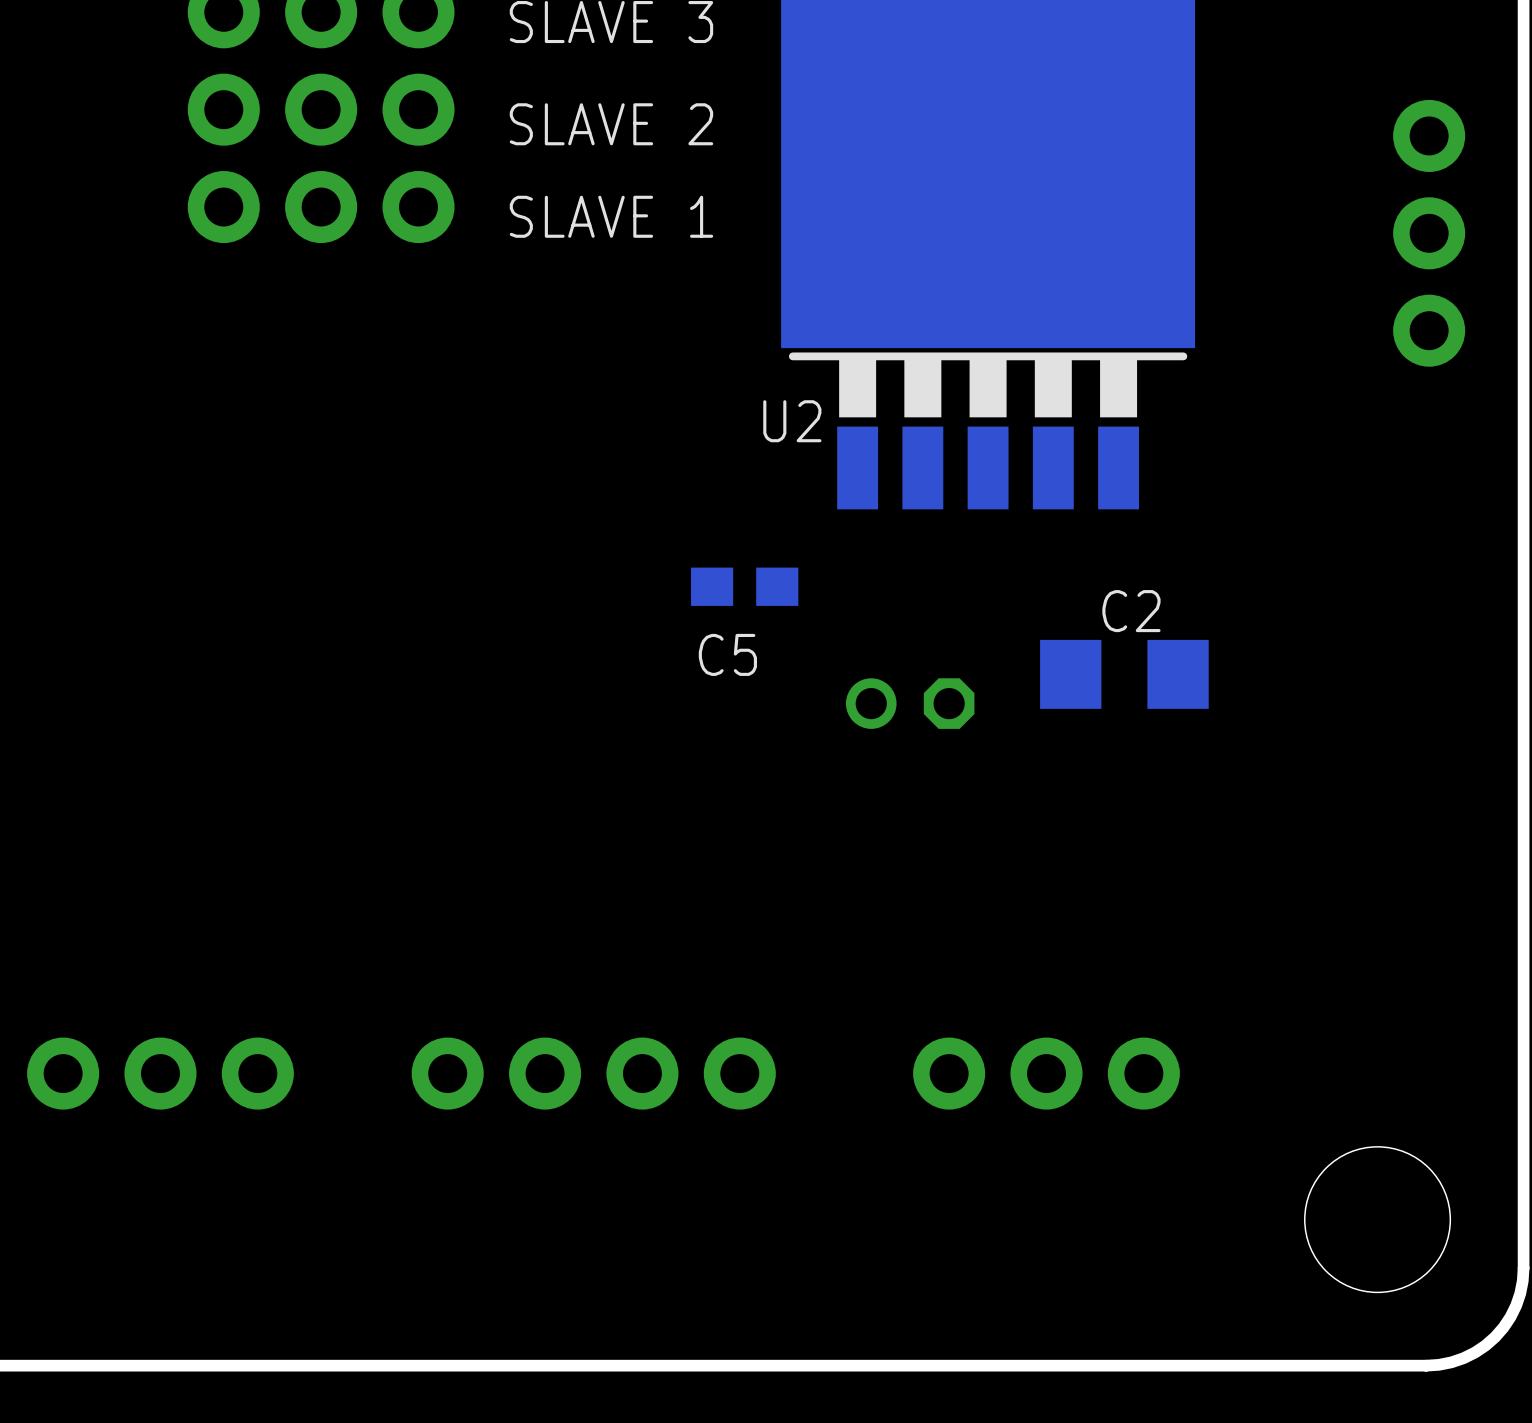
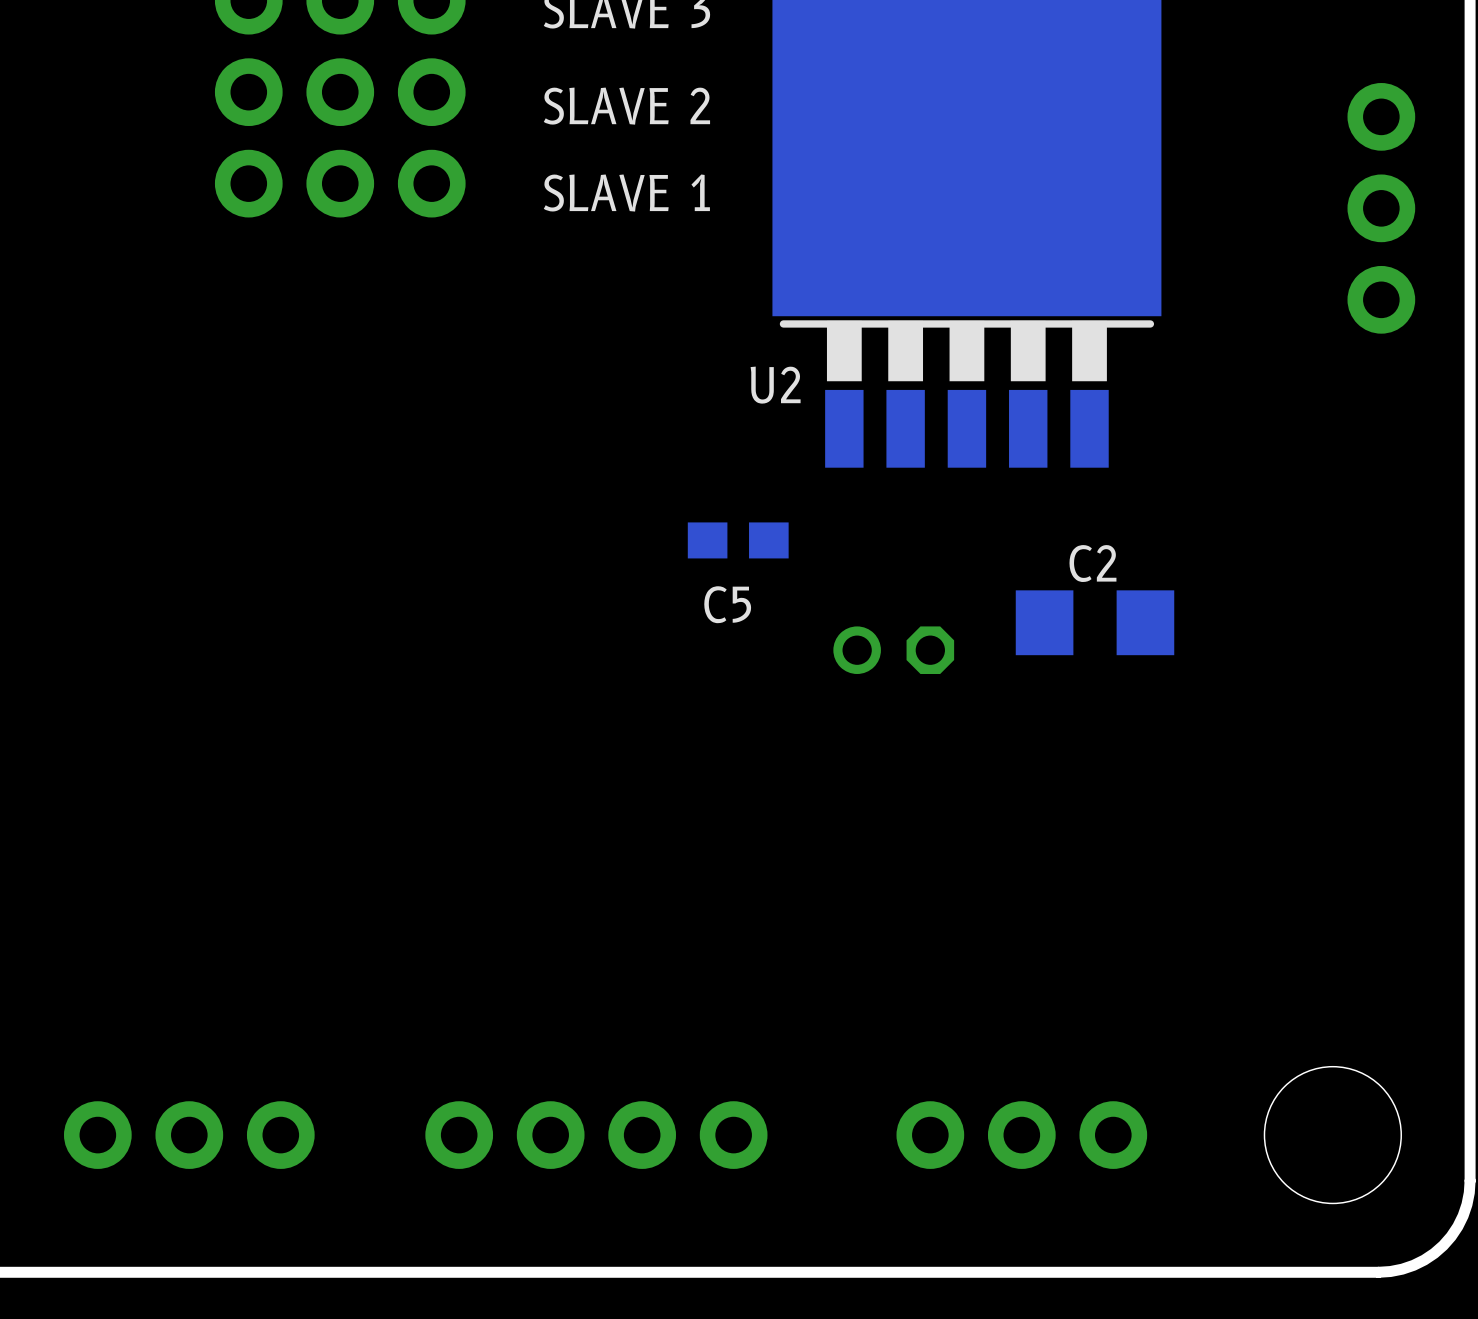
part position: (160, 1073) -> (189, 1135)
part position: (593, 1073) -> (596, 1135)
part position: (1046, 1073) -> (1021, 1135)

